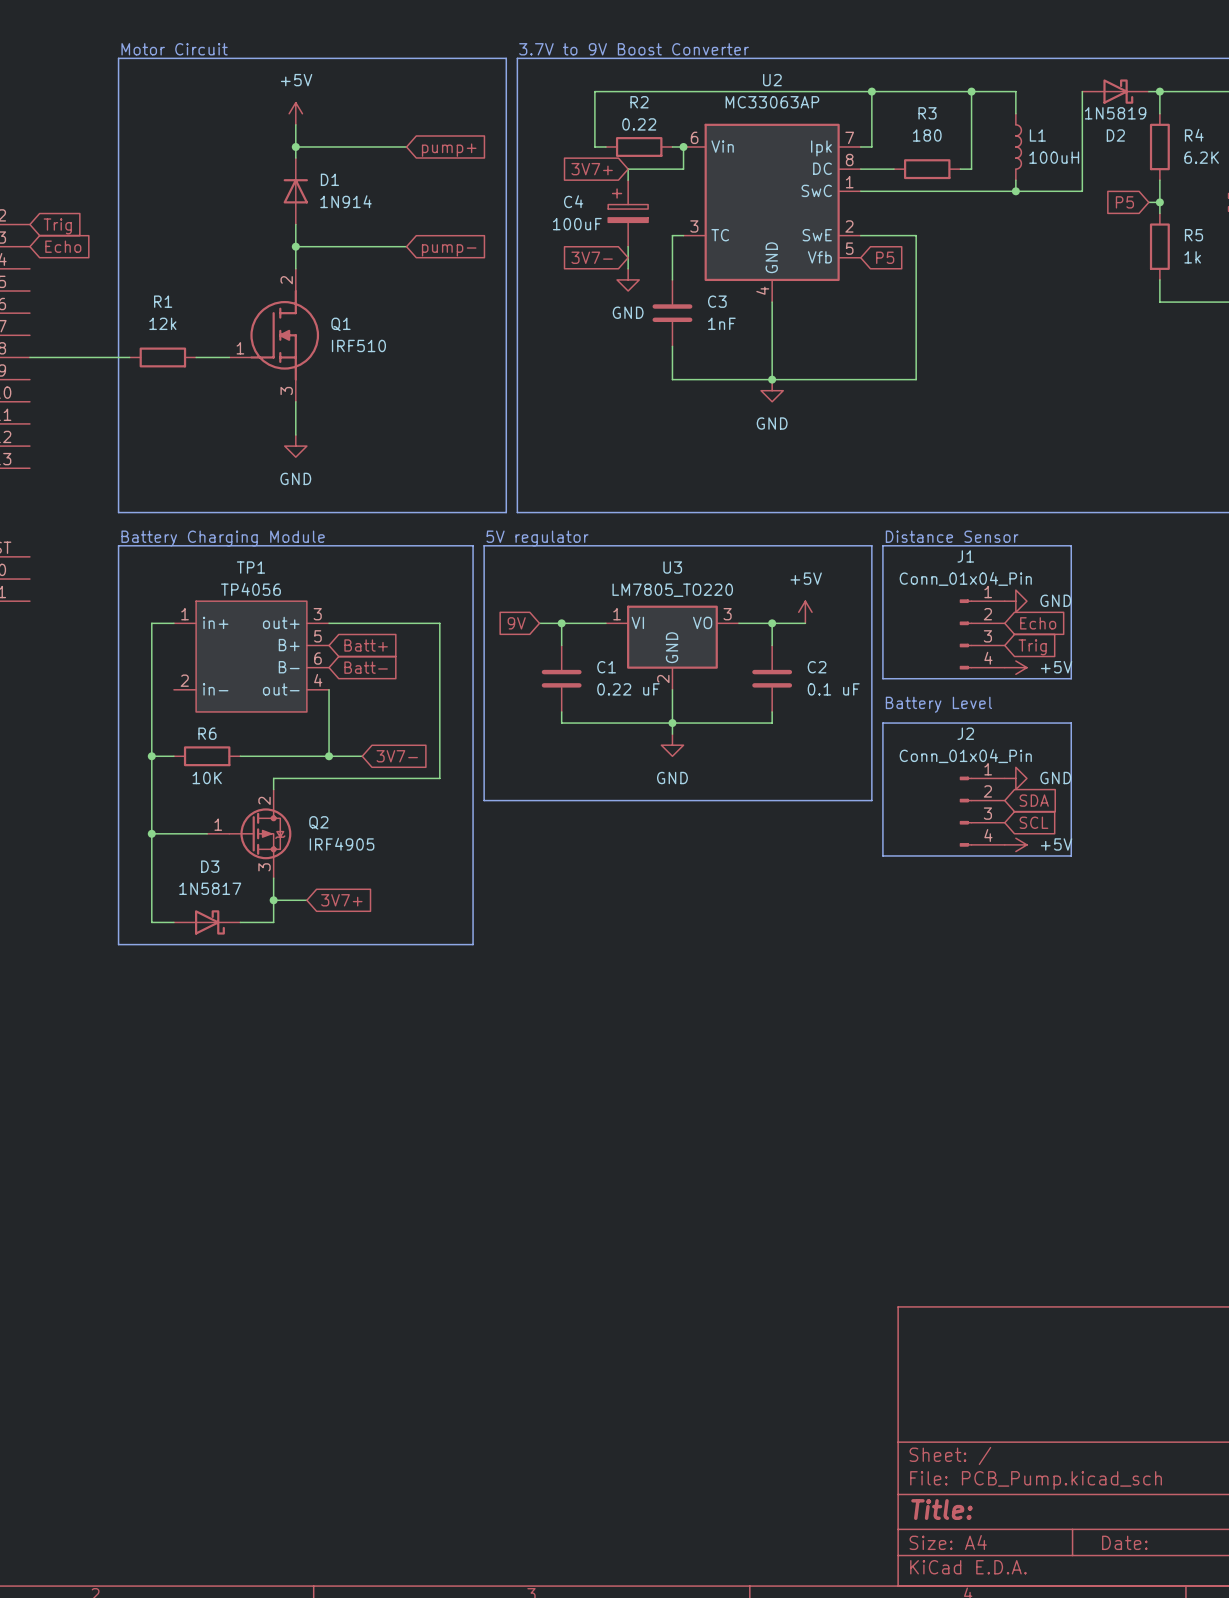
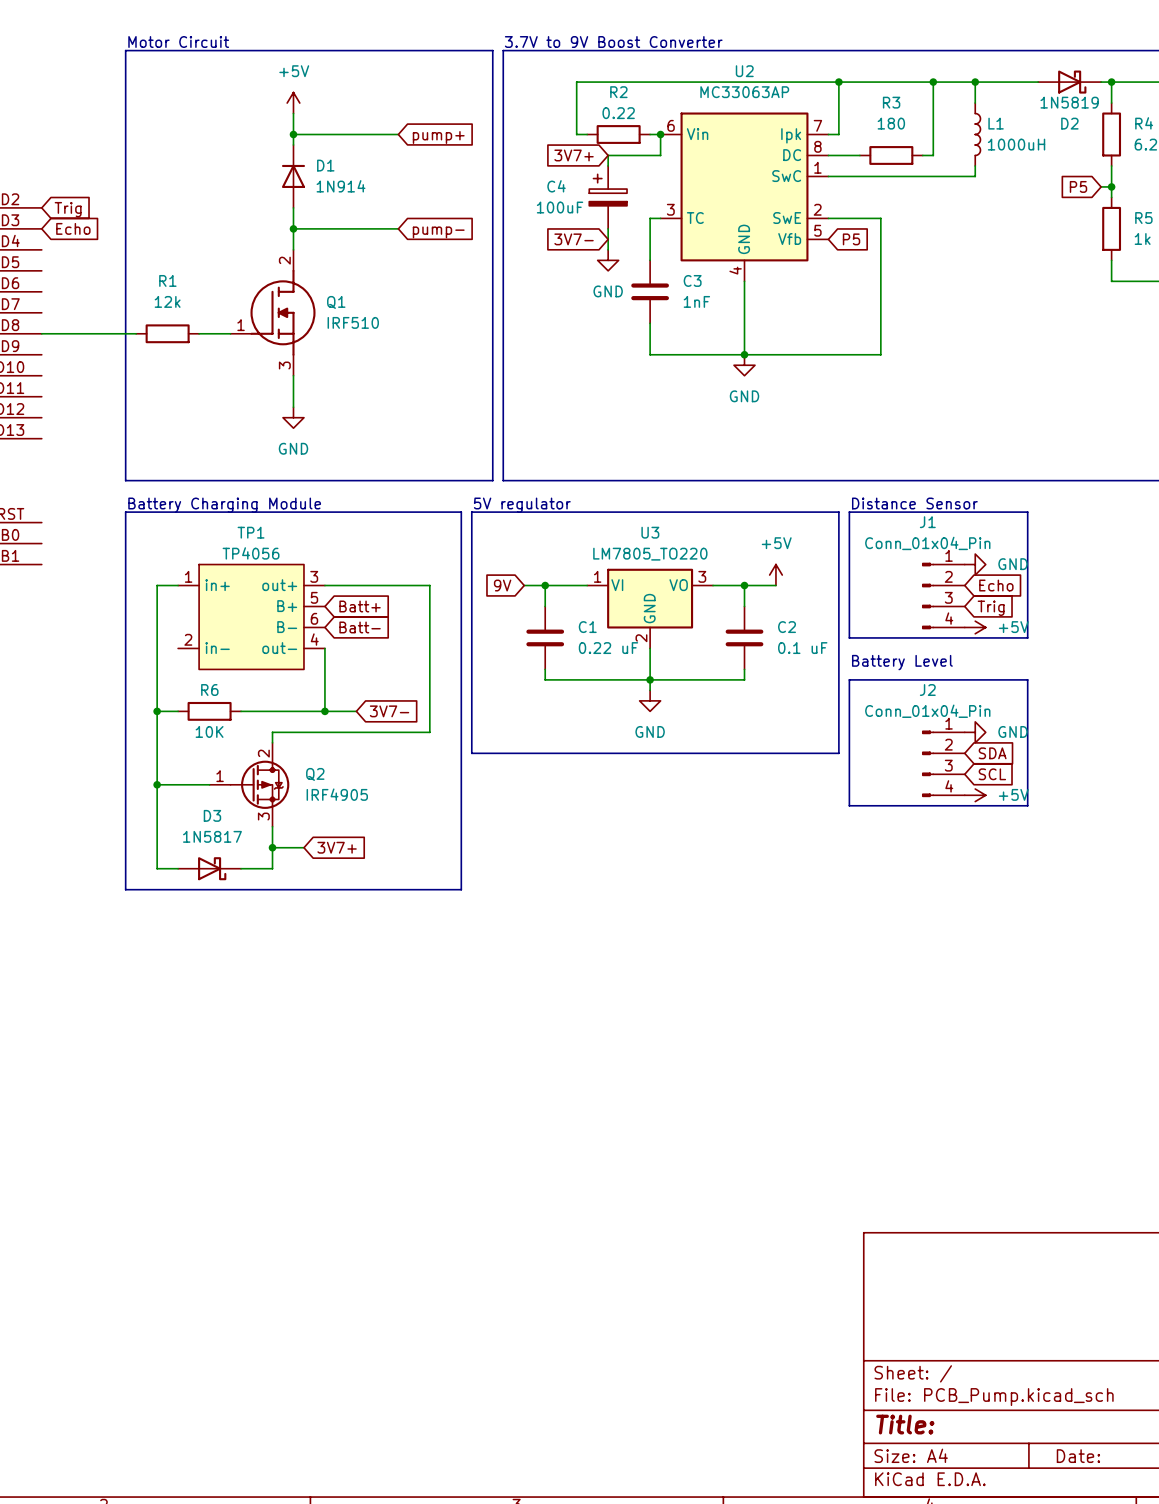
junction: none -> (975, 82)
wire: (1082, 91) (1082, 191) (1015, 191) -> (1038, 82) (975, 82)
L1 value: 100uH (1054, 157) -> 1000uH (1016, 144)
junction: (1015, 191) -> none

